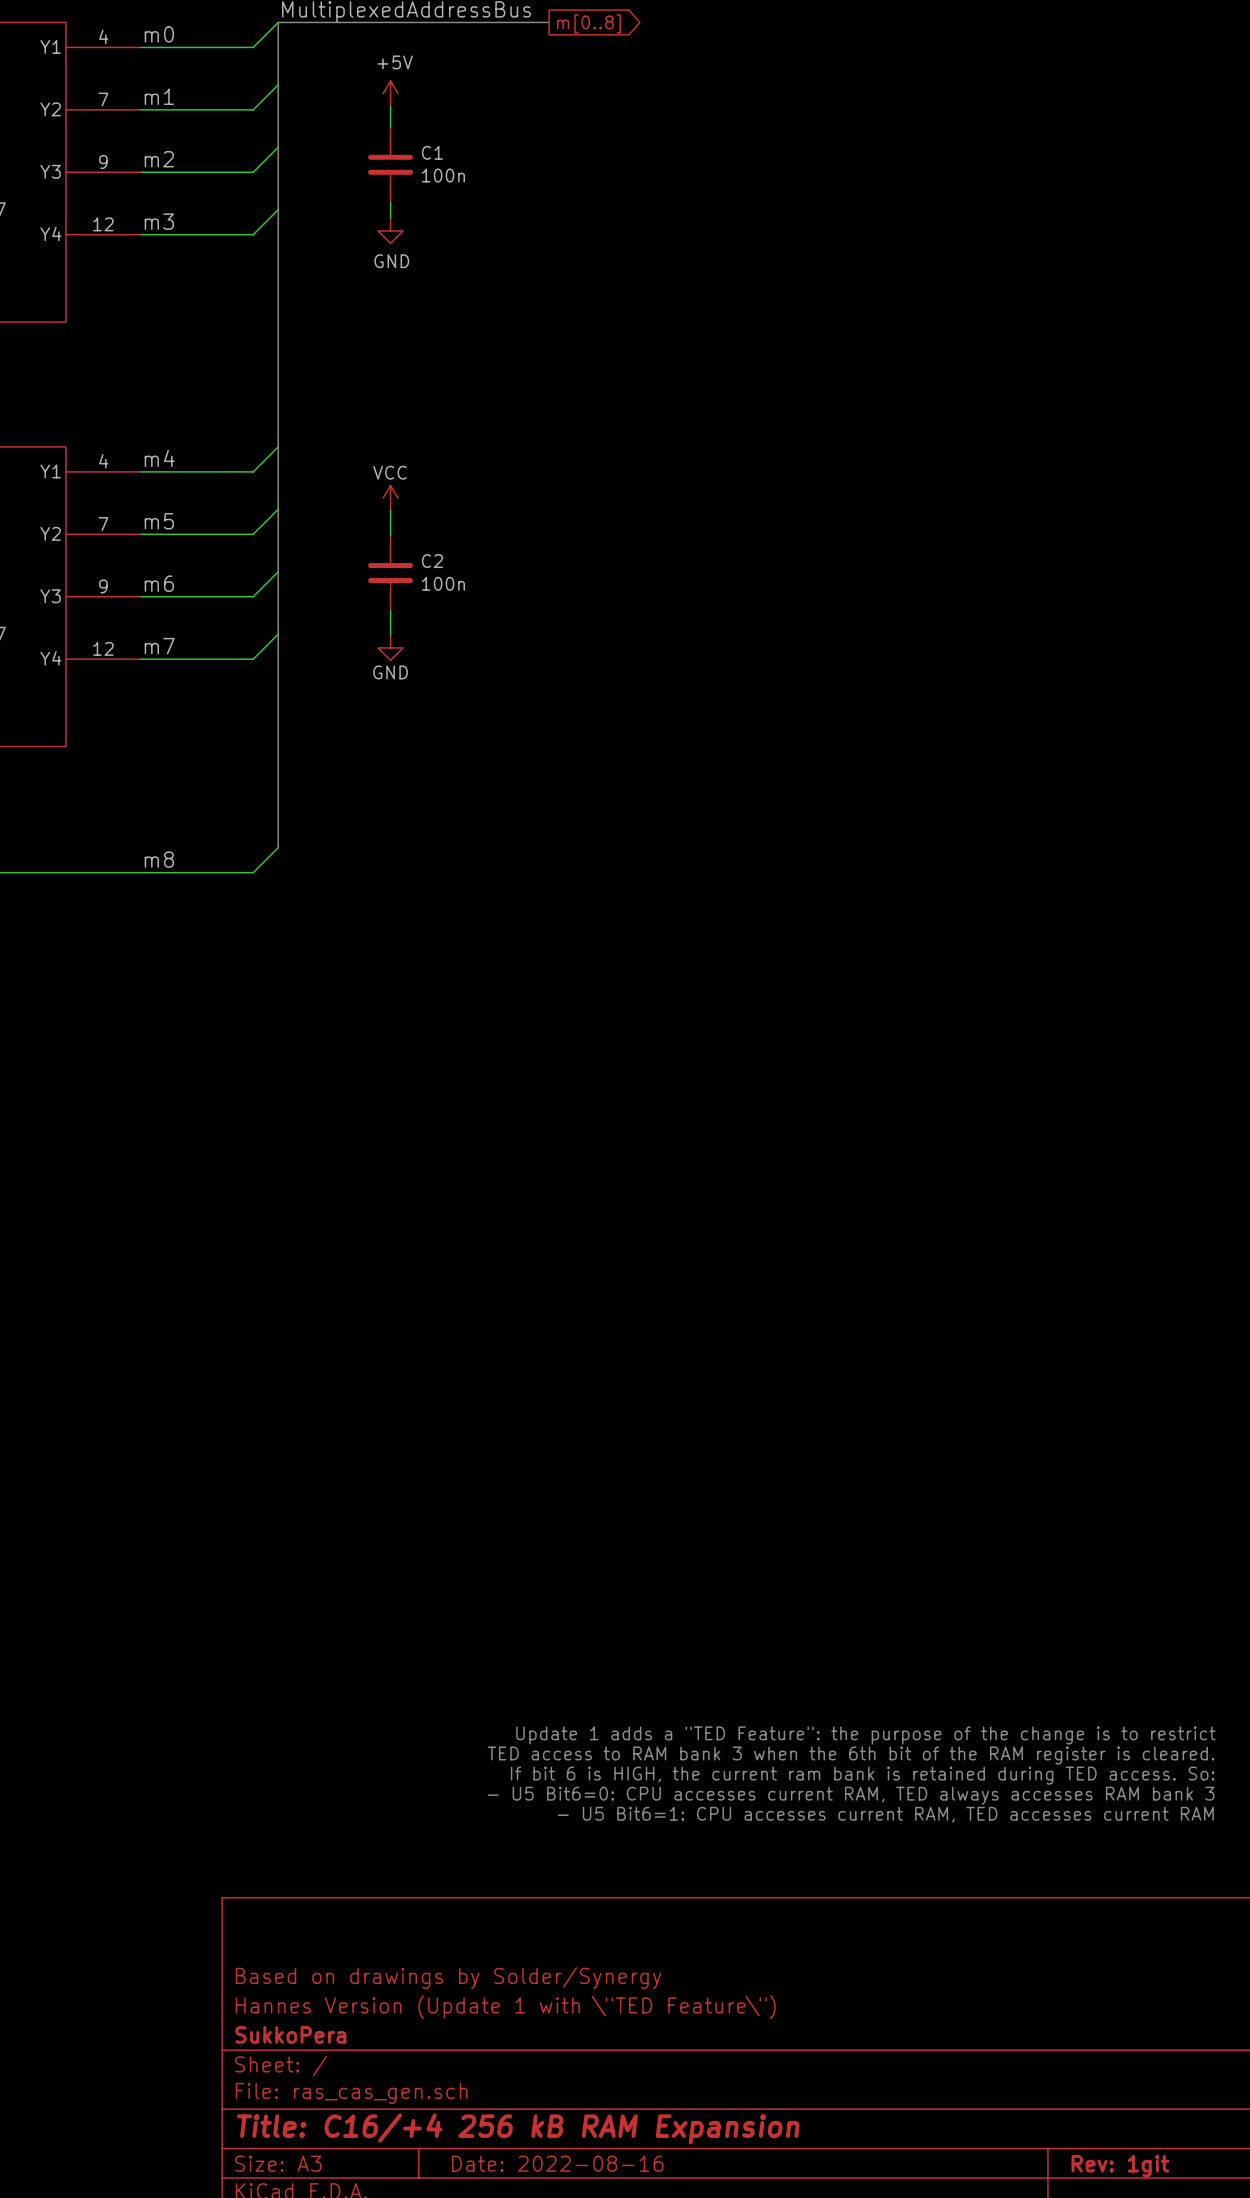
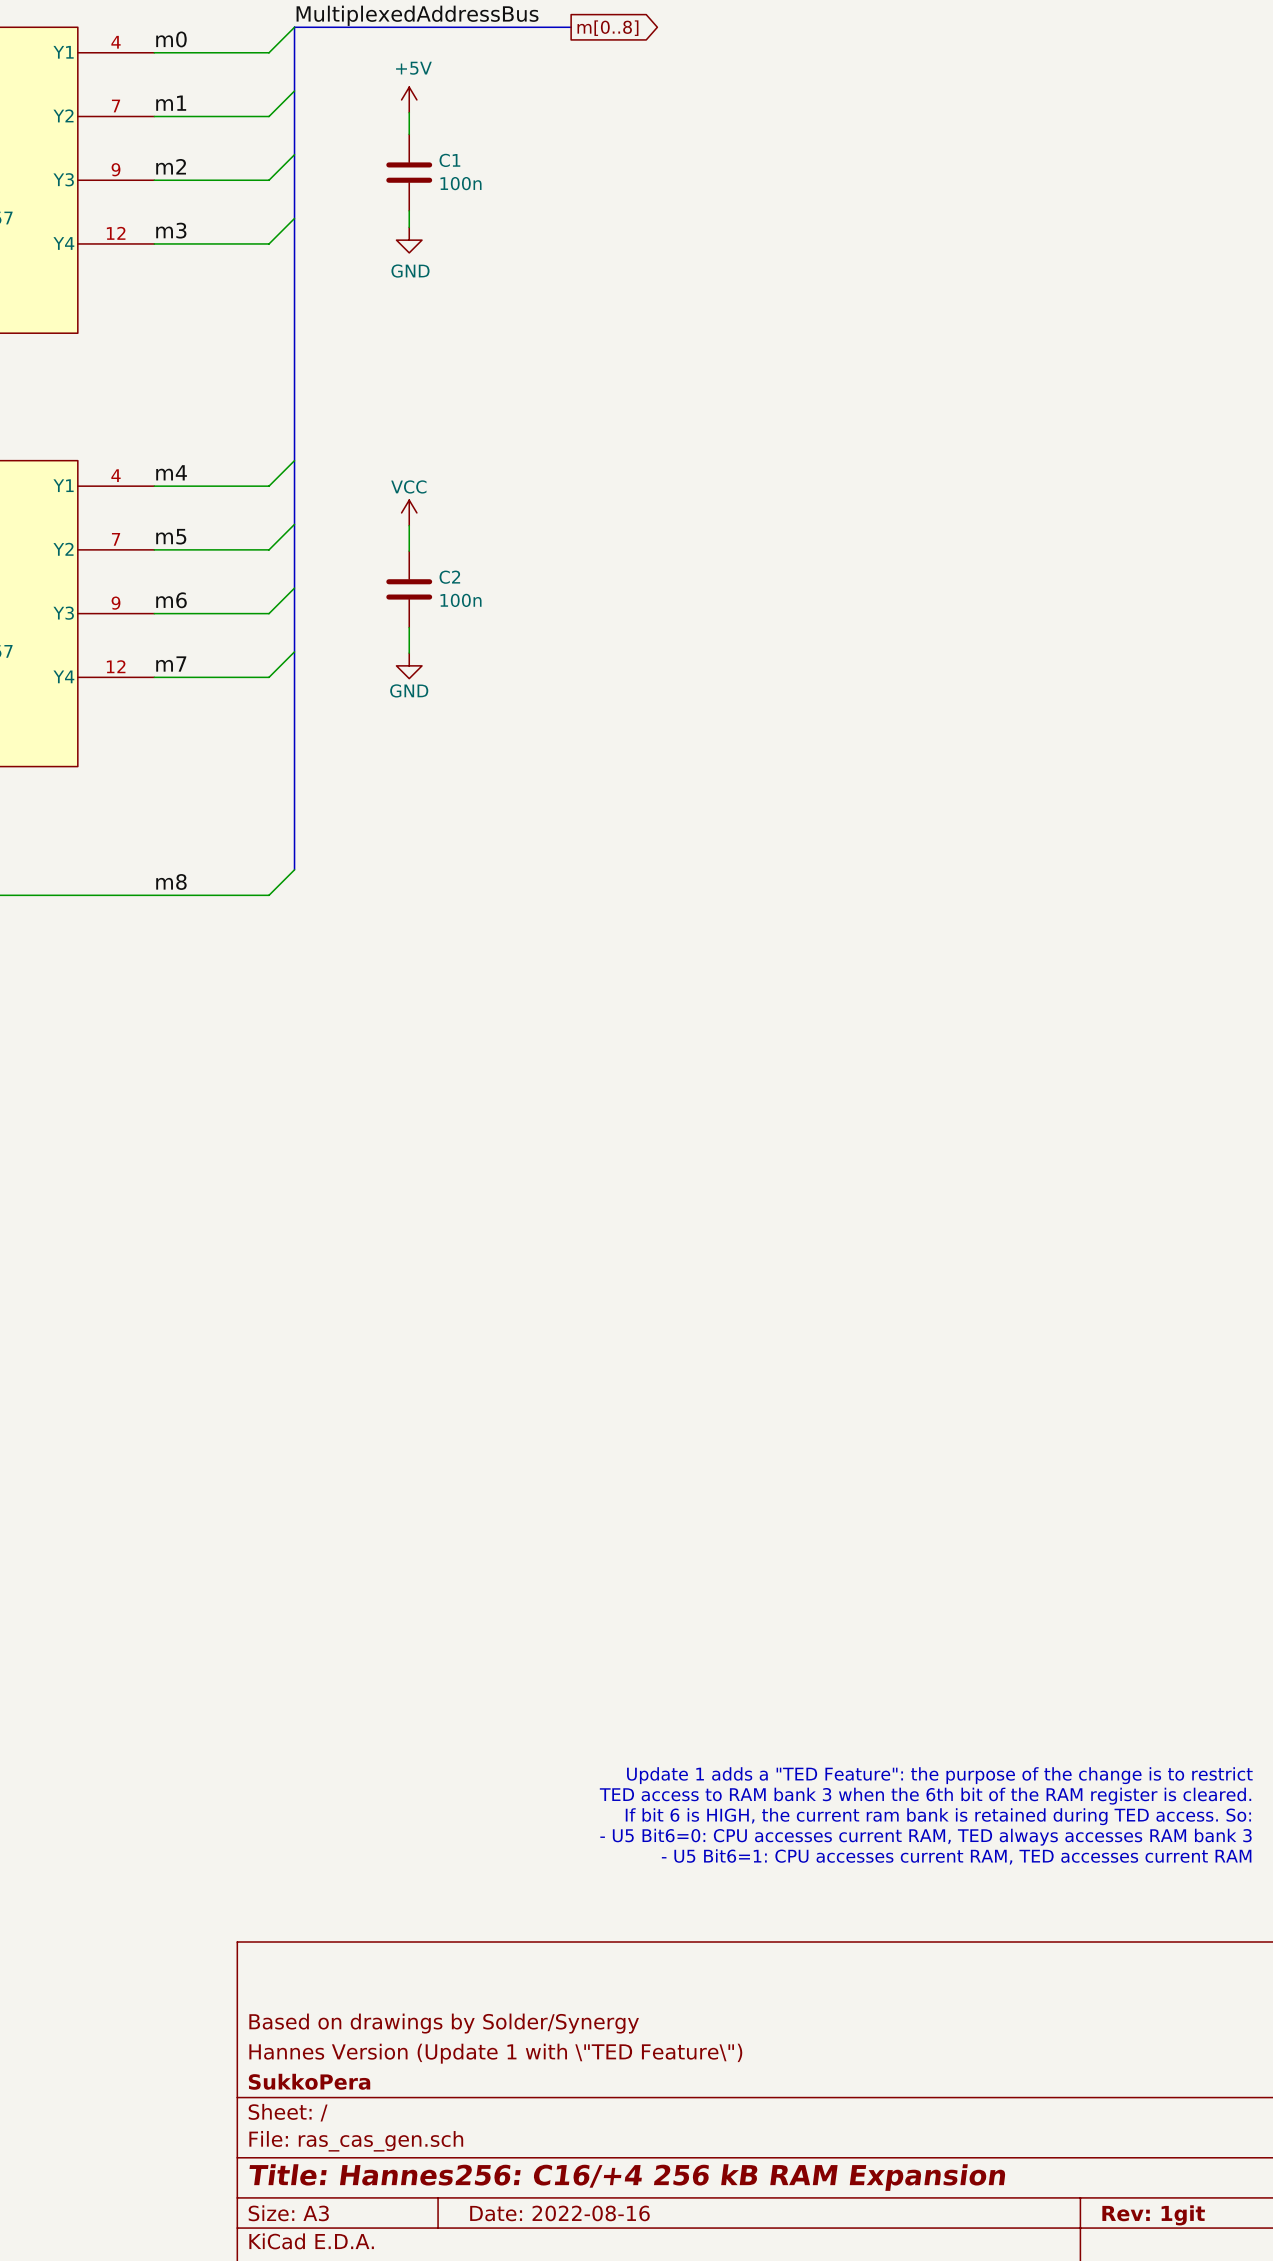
title block: Title: C16/+4 256 kB RAM Expansion (518, 2128) -> Title: Hannes256: C16/+4 256 kB RAM Expansion (627, 2177)

